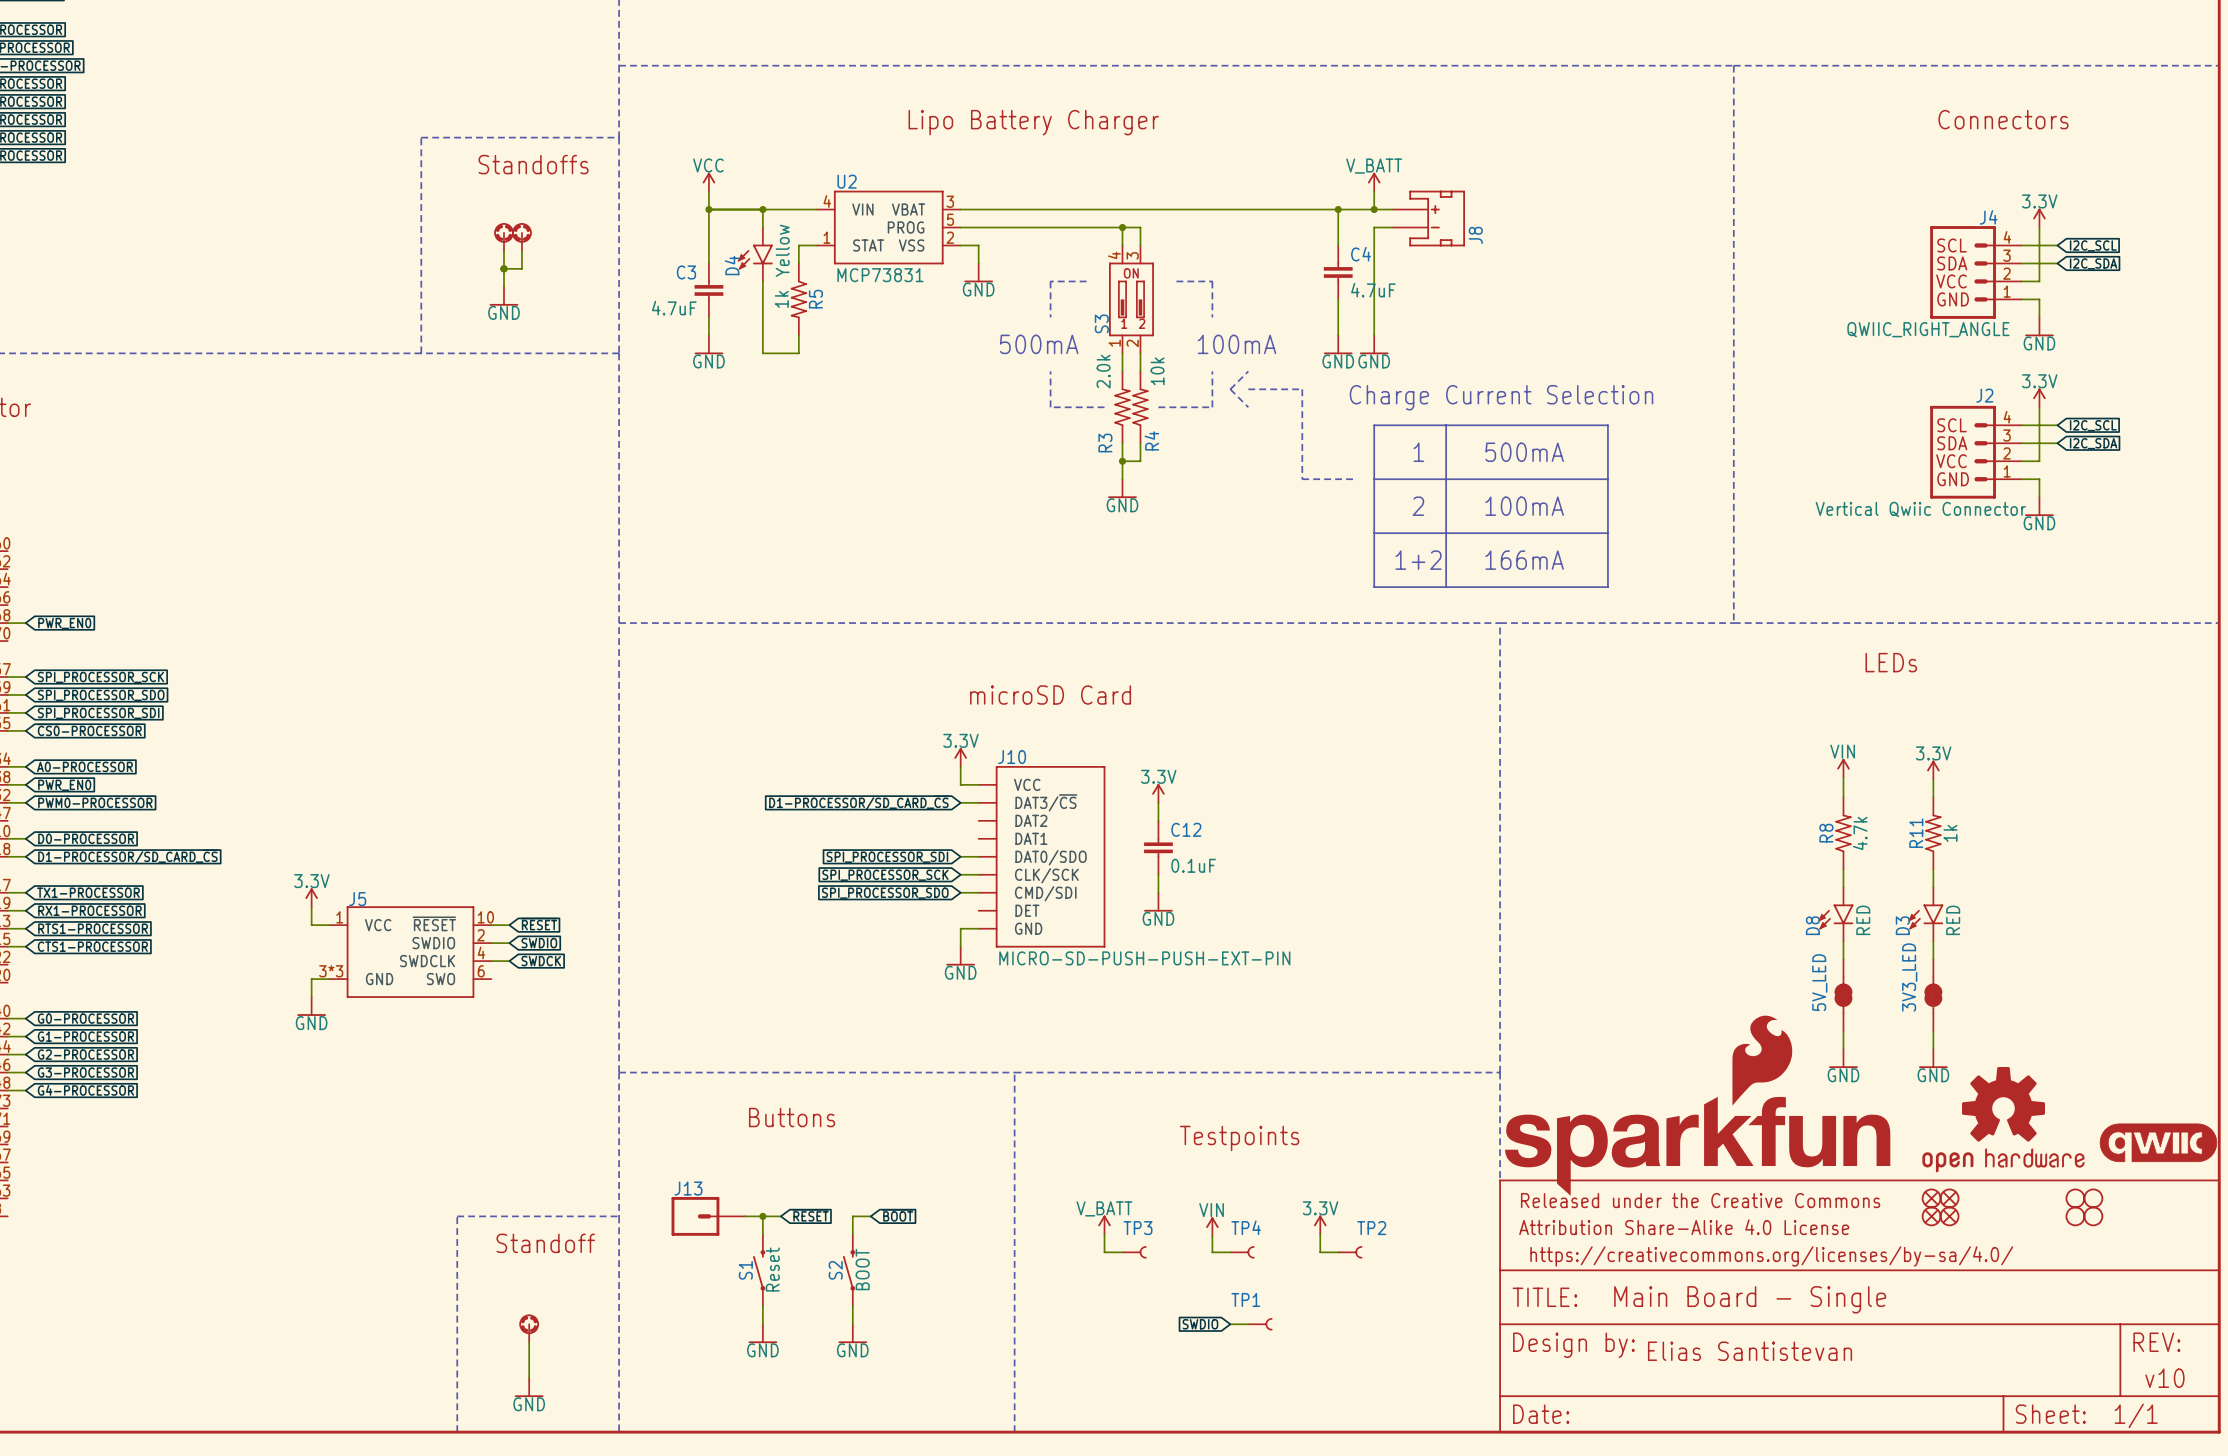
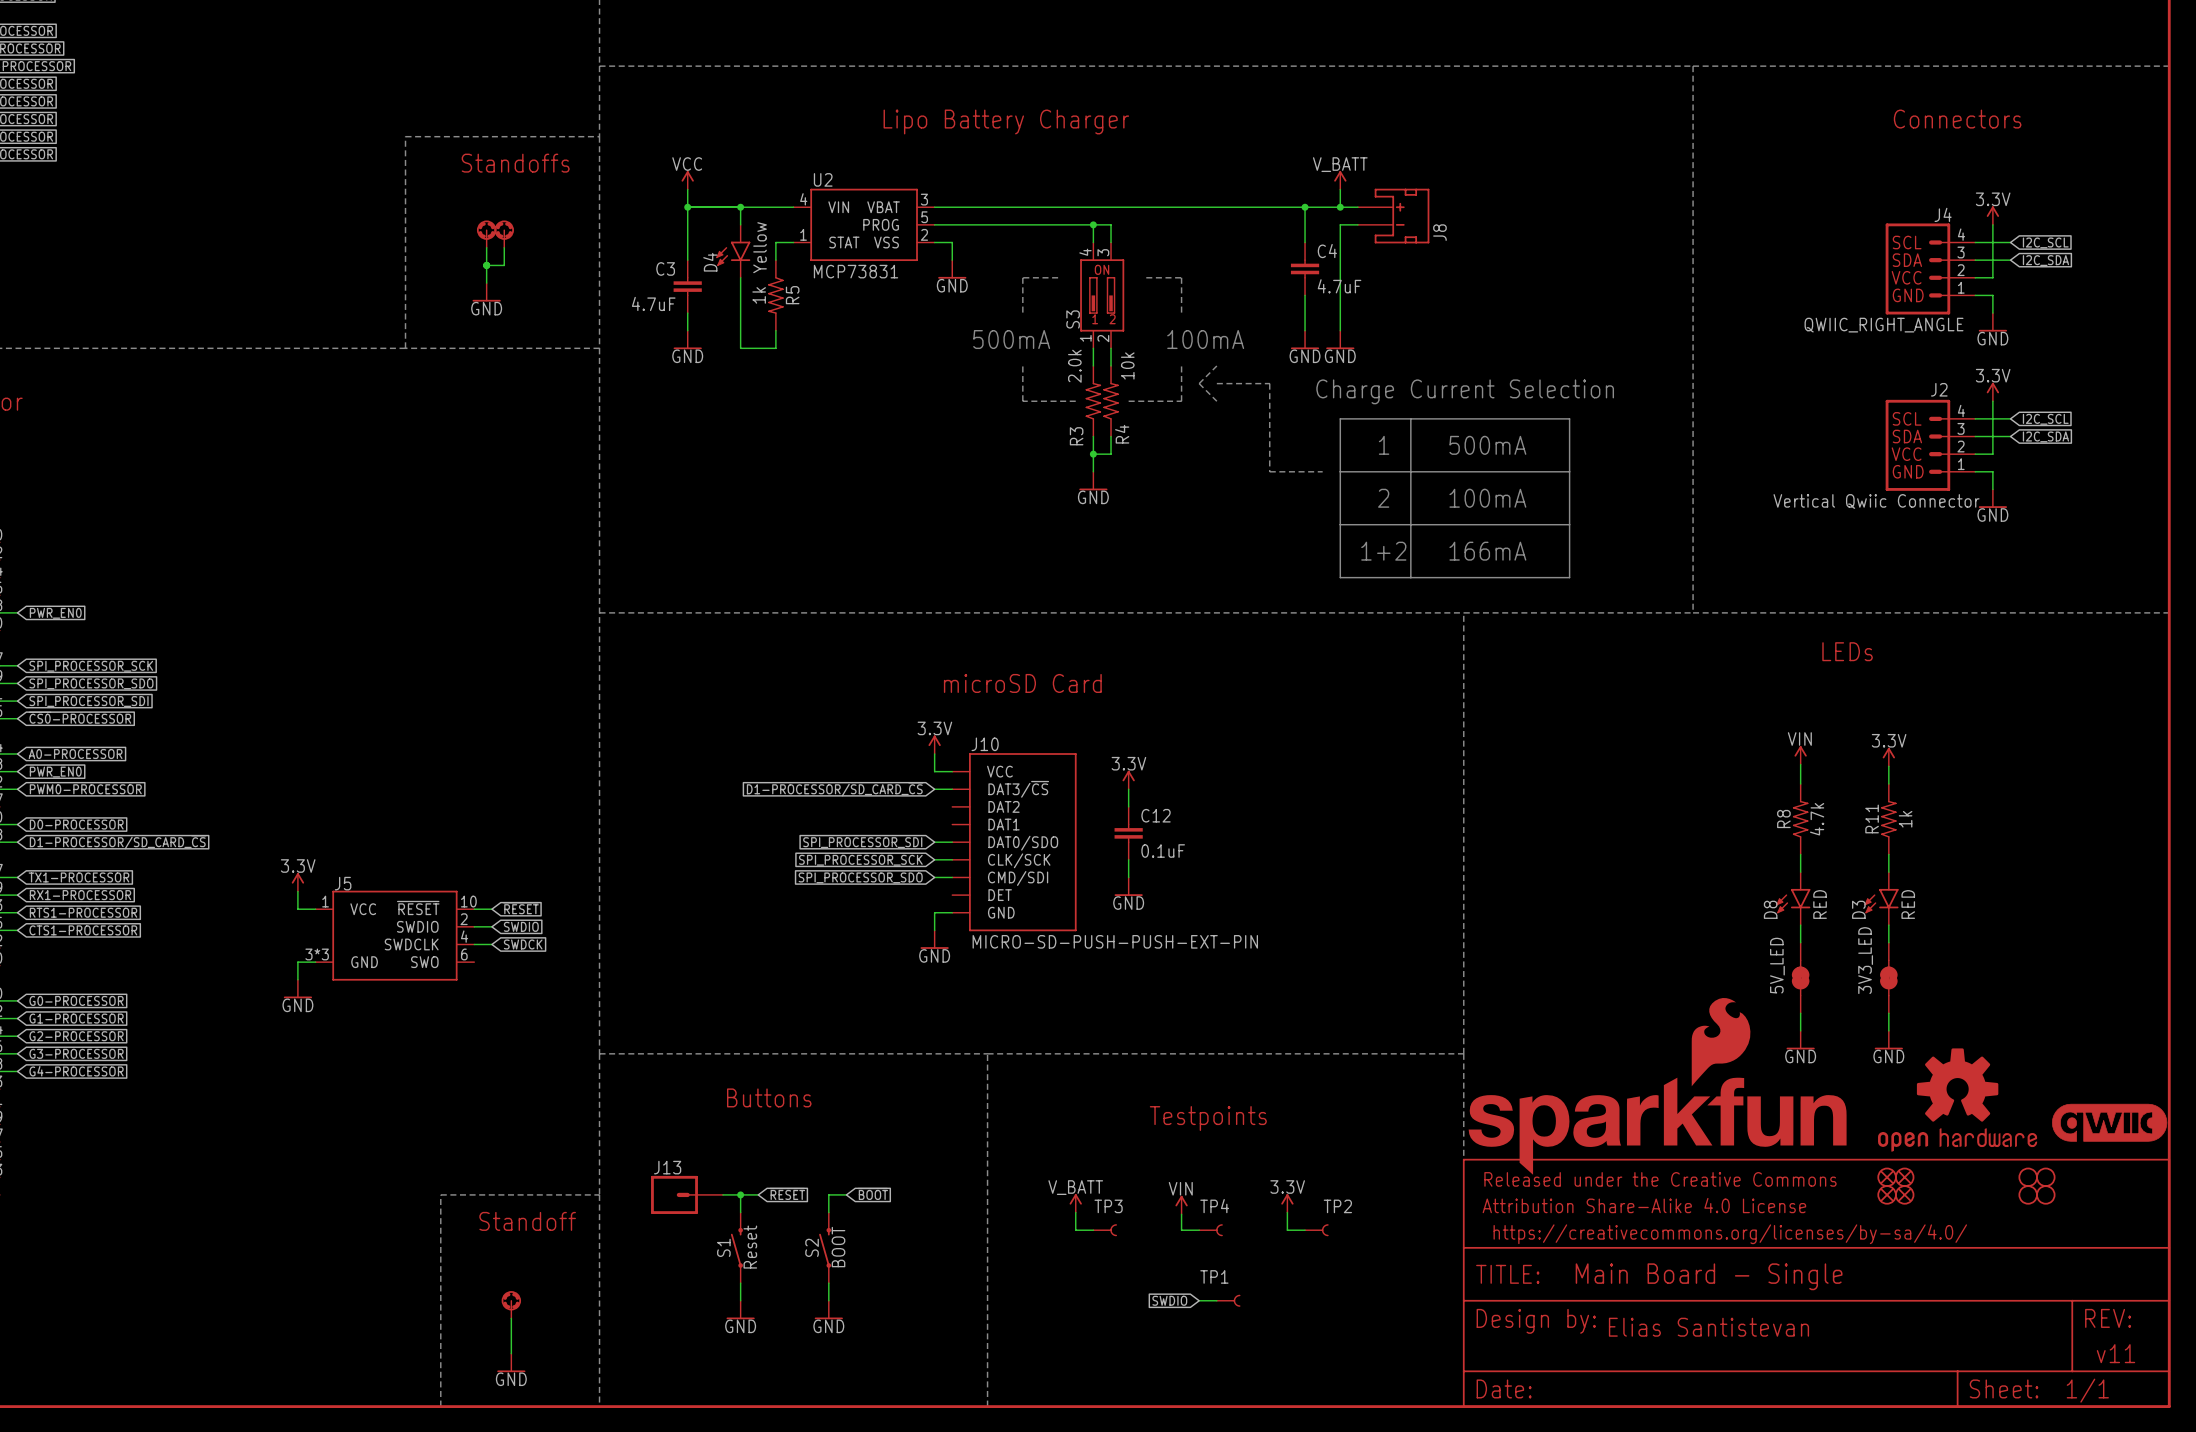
text: v10 (2164, 1378) -> v11 (2115, 1353)

